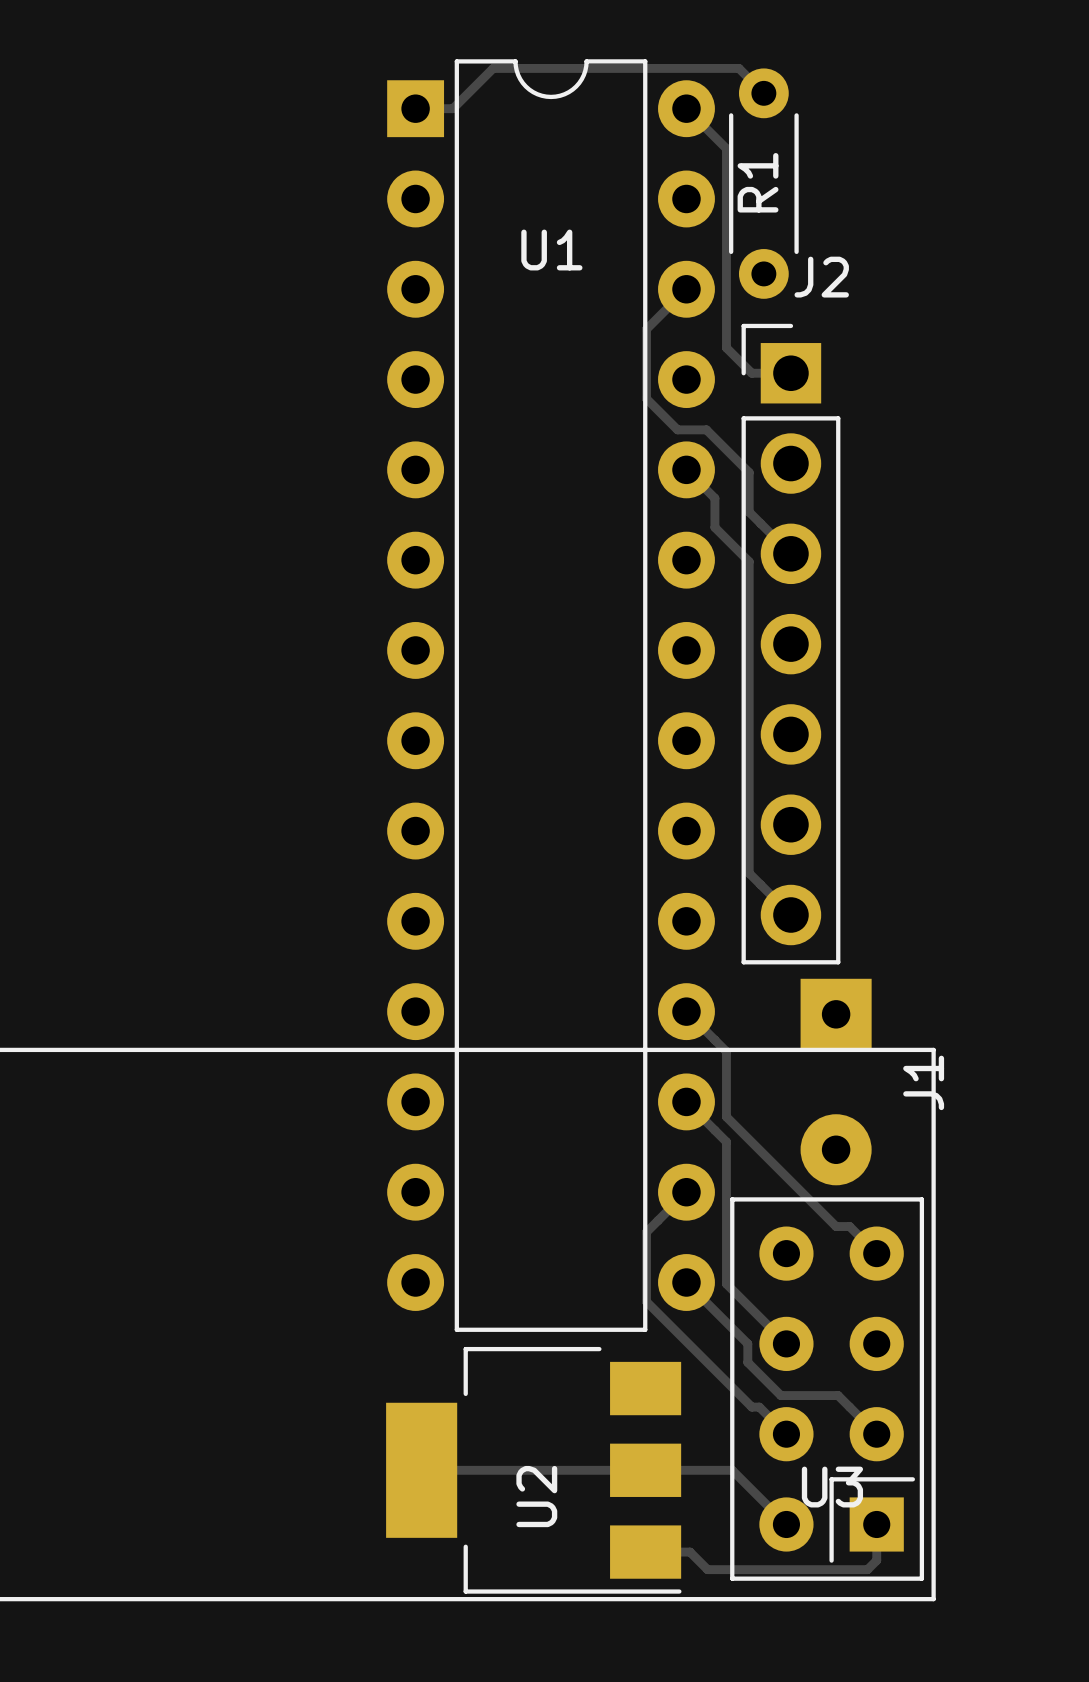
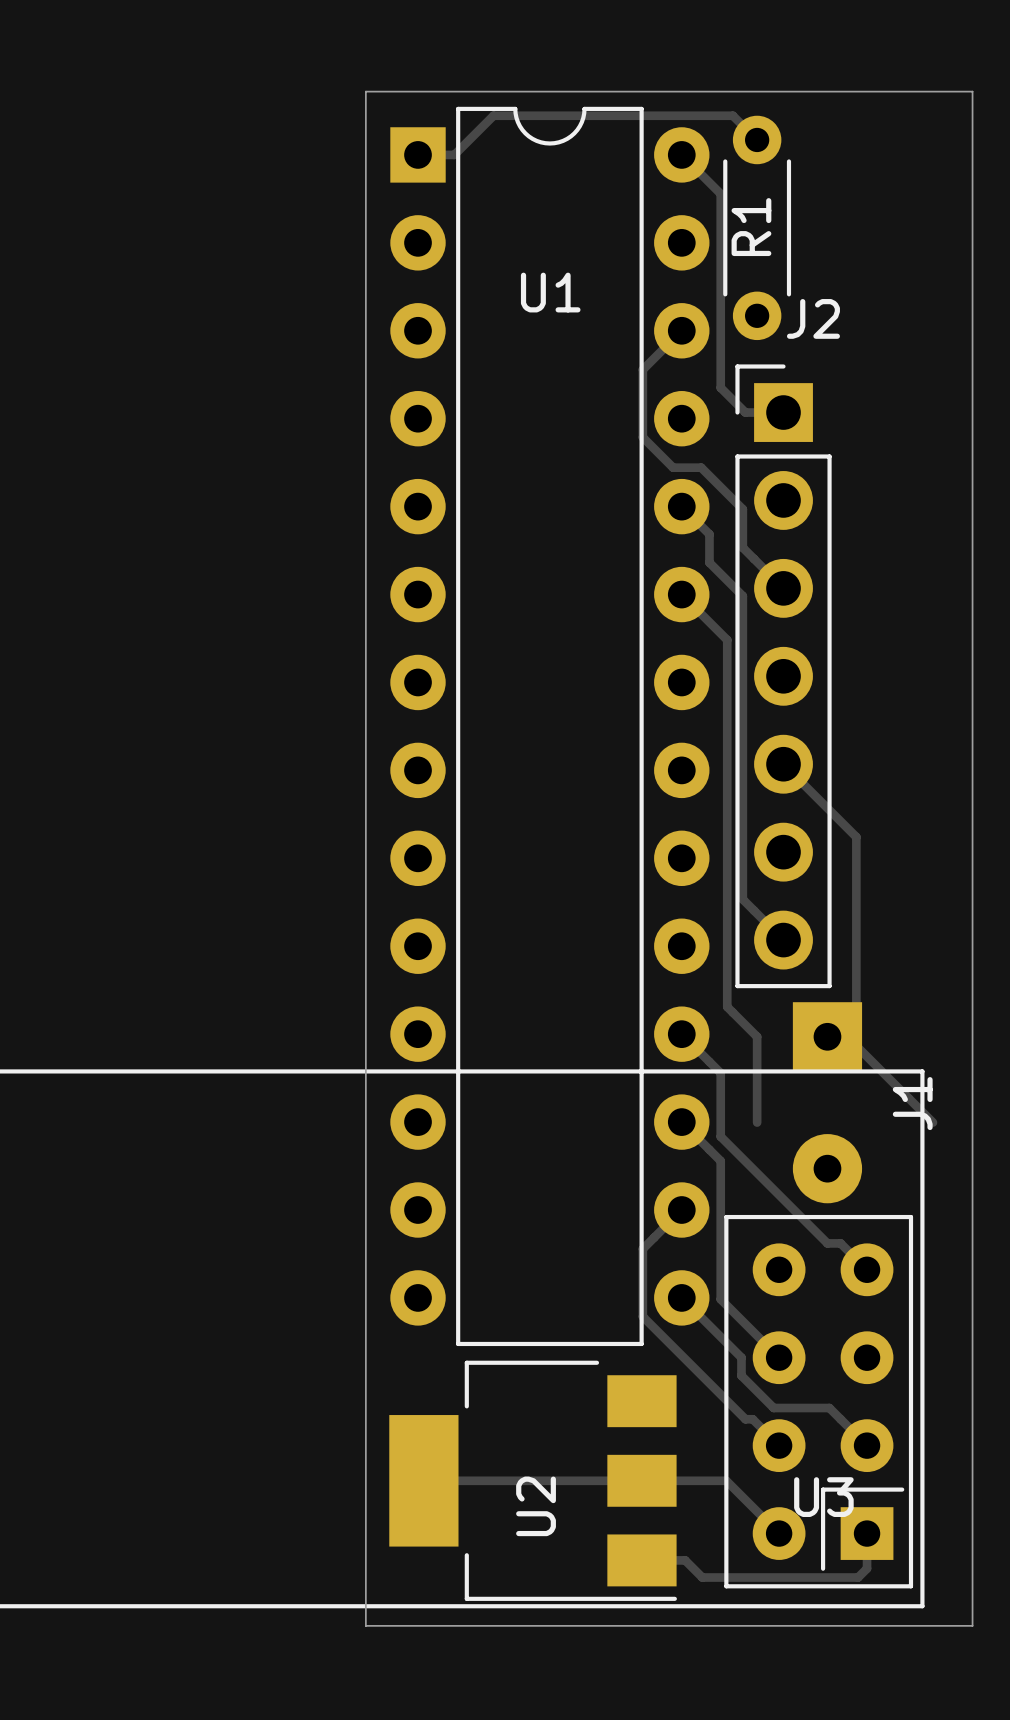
board edge: none -> (365, 91) (365, 1625) (972, 1625) (972, 91) (365, 91)
track: none -> (681, 594) (727, 640) (727, 1006) (757, 1036) (757, 1122)
track: none -> (783, 764) (856, 837) (856, 1045) (932, 1122)

